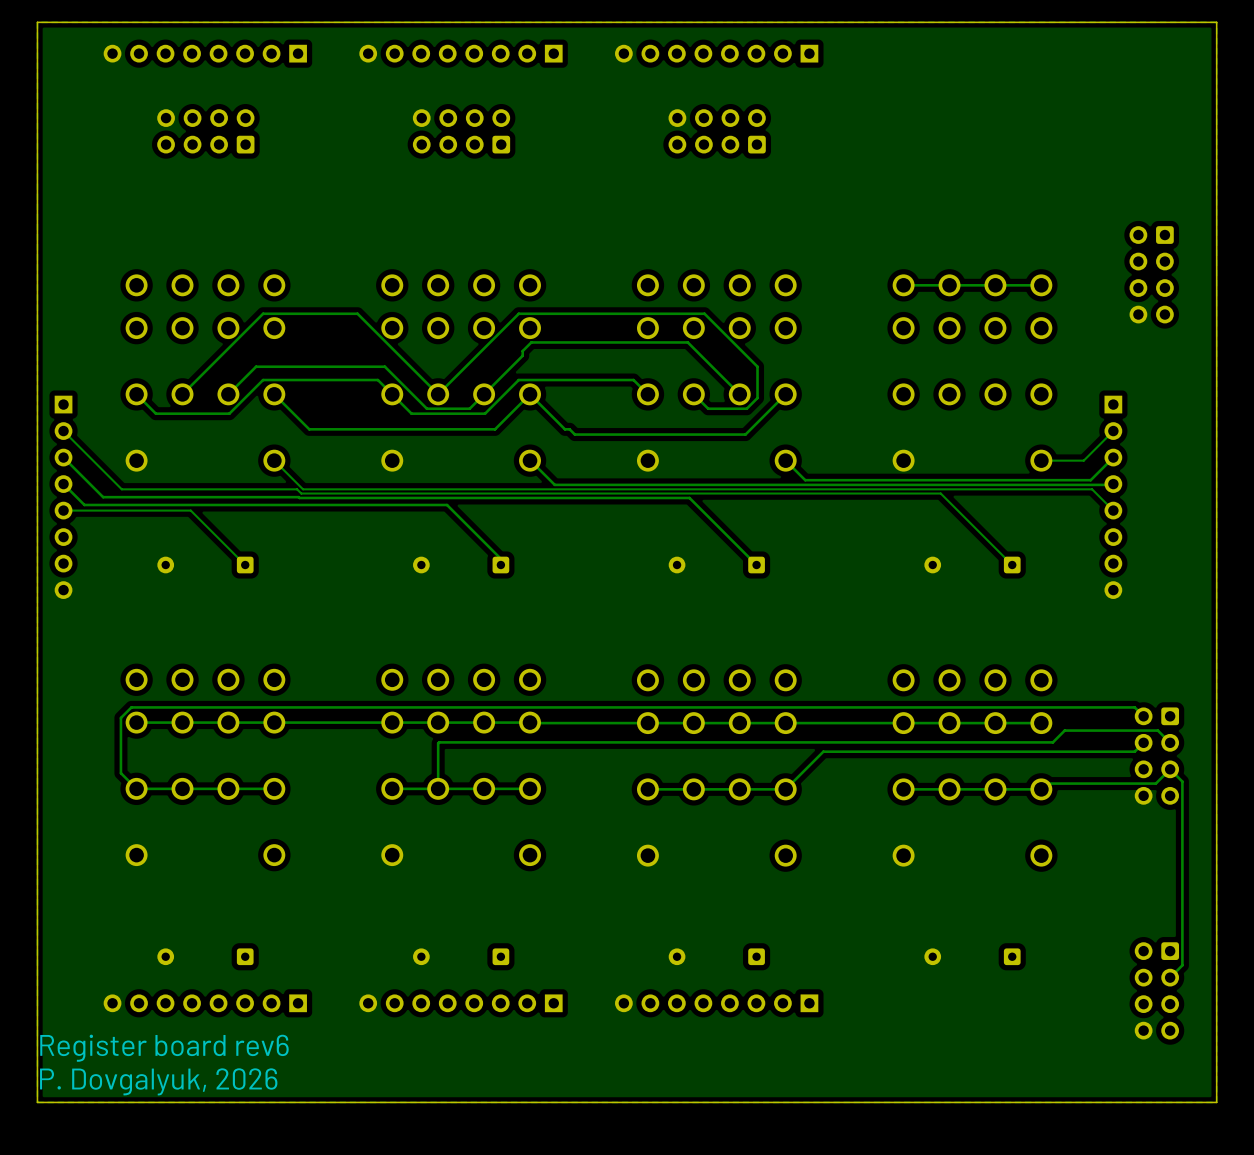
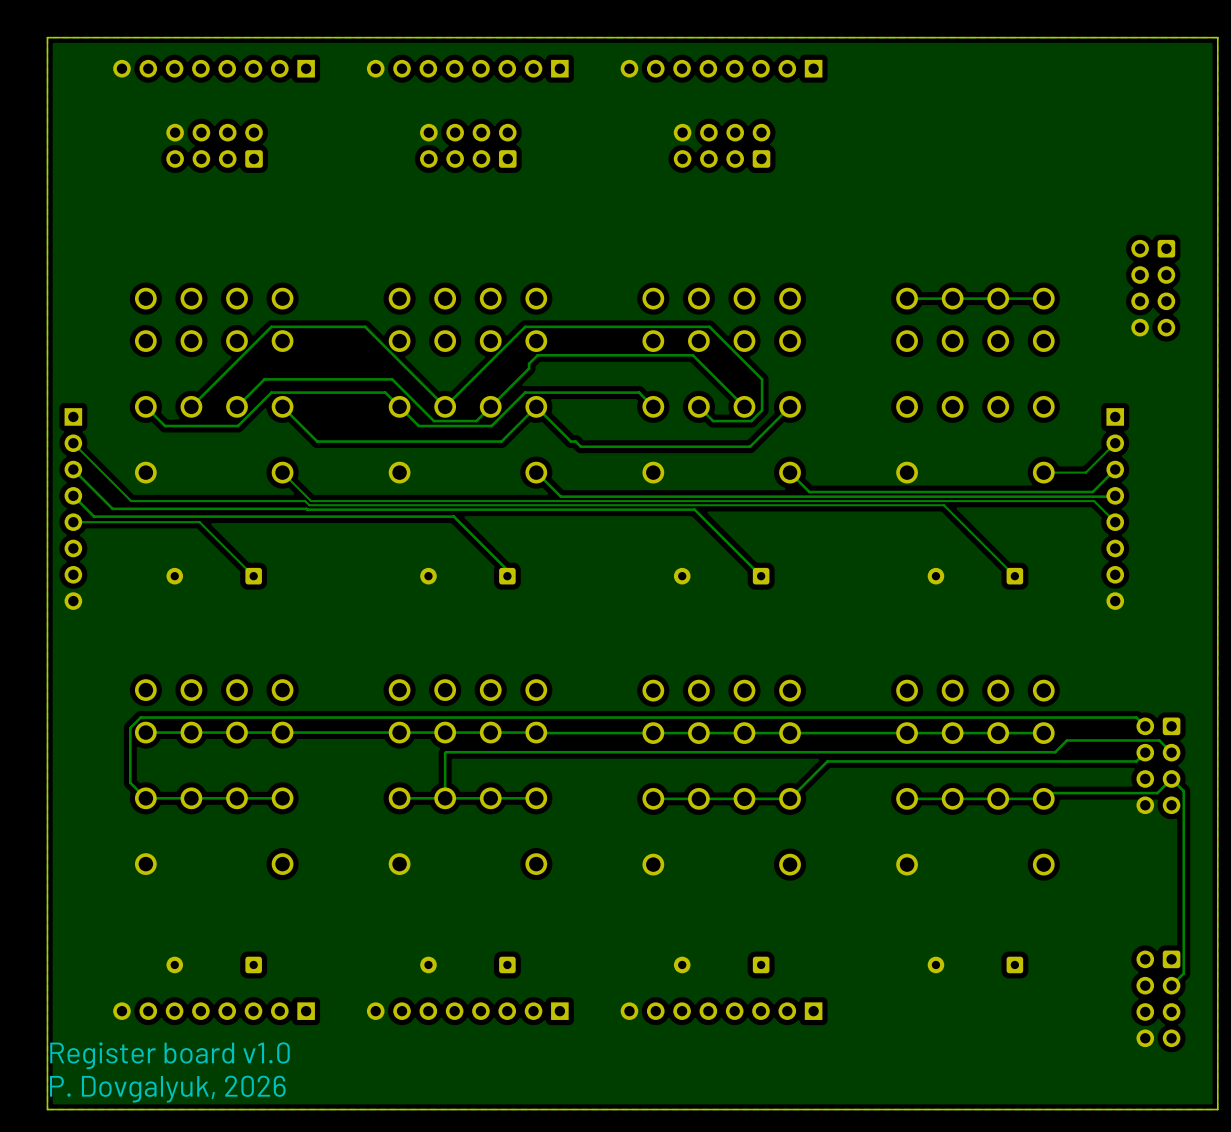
text: Register board rev6 (164, 1048) -> Register board v1.0 (169, 1055)

